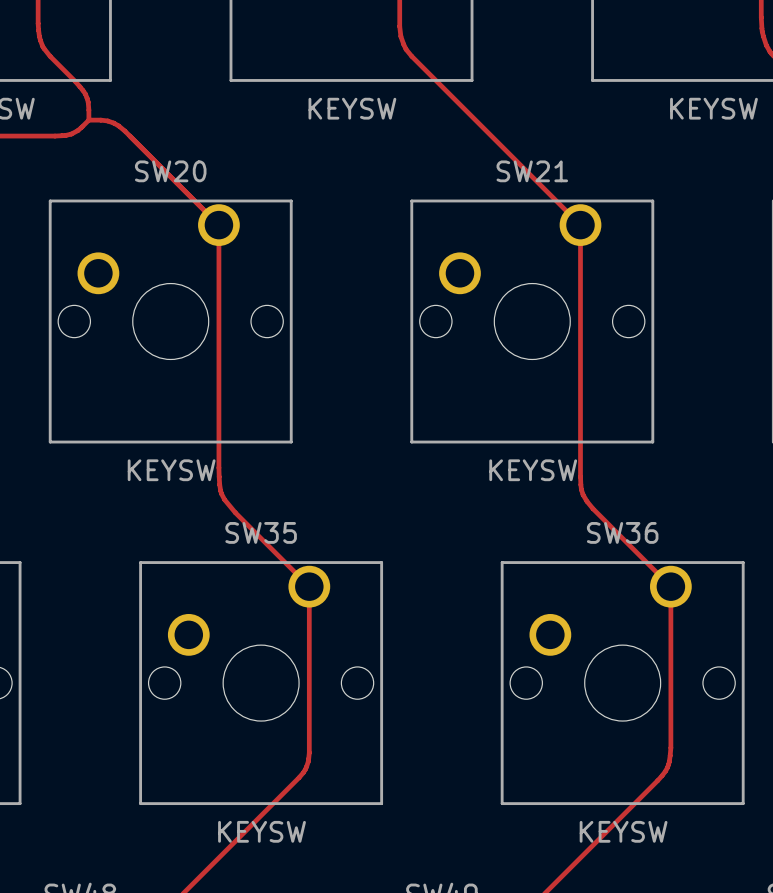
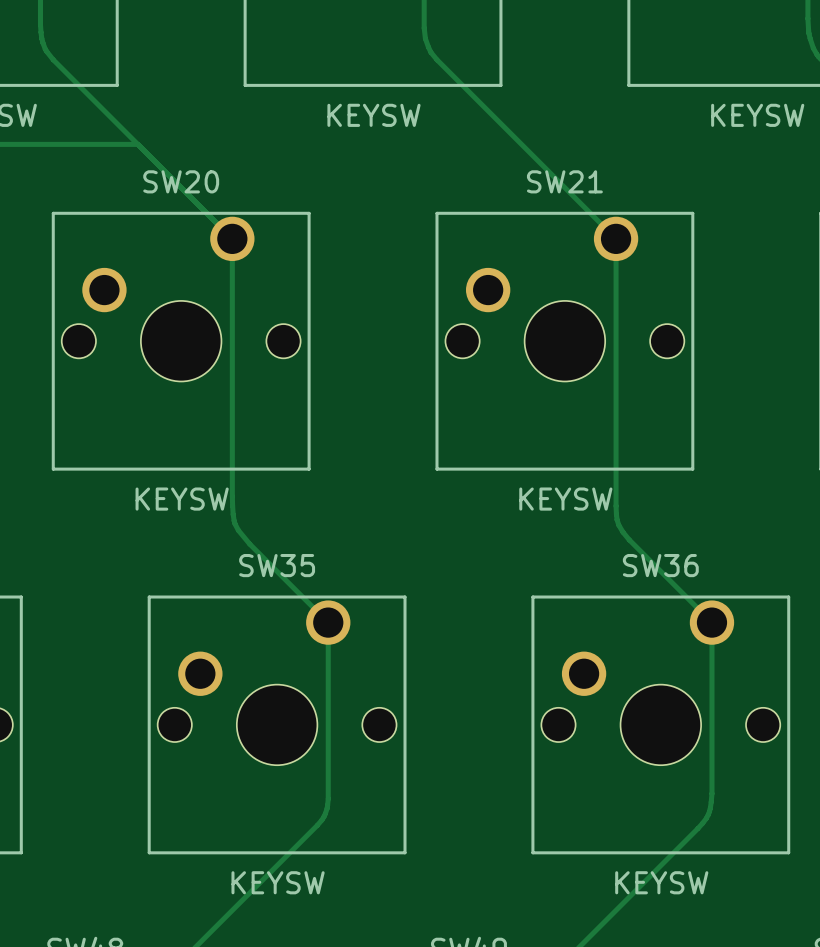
track: (75, 81) (87, 98) (88, 120) -> (79, 86) (132, 139)
track: (88, 120) (71, 134) (55, 136) -> (137, 144) (58, 144)
track: (88, 120) (107, 120) (124, 131) -> none

